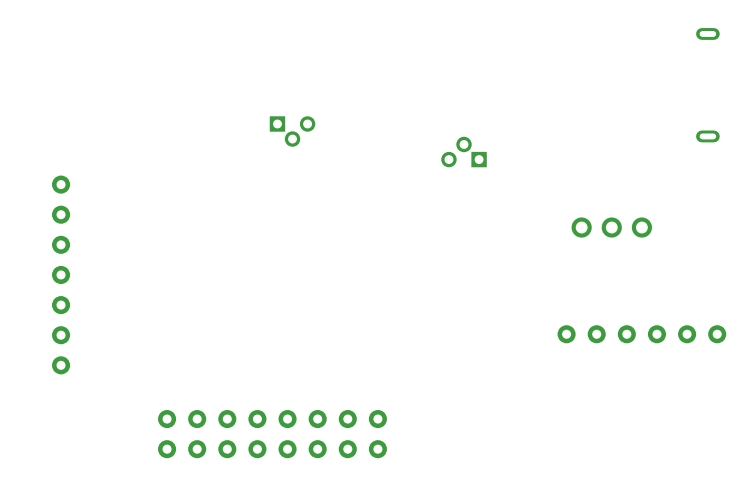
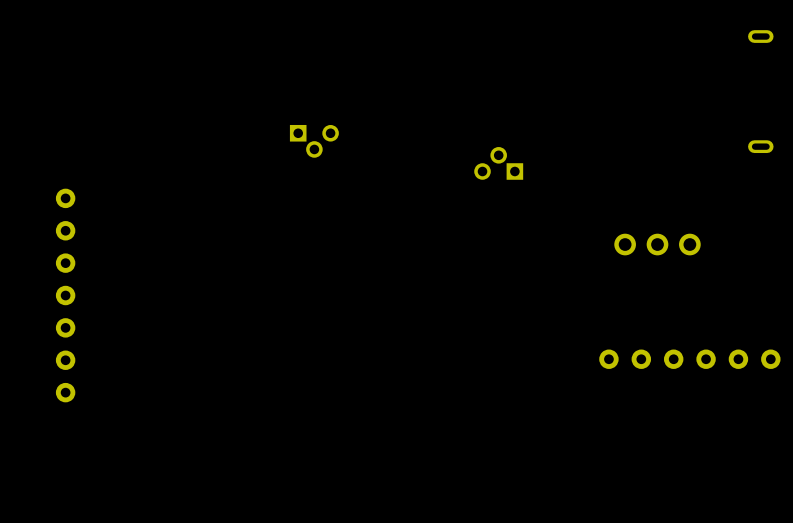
part: (272, 434) -> none

